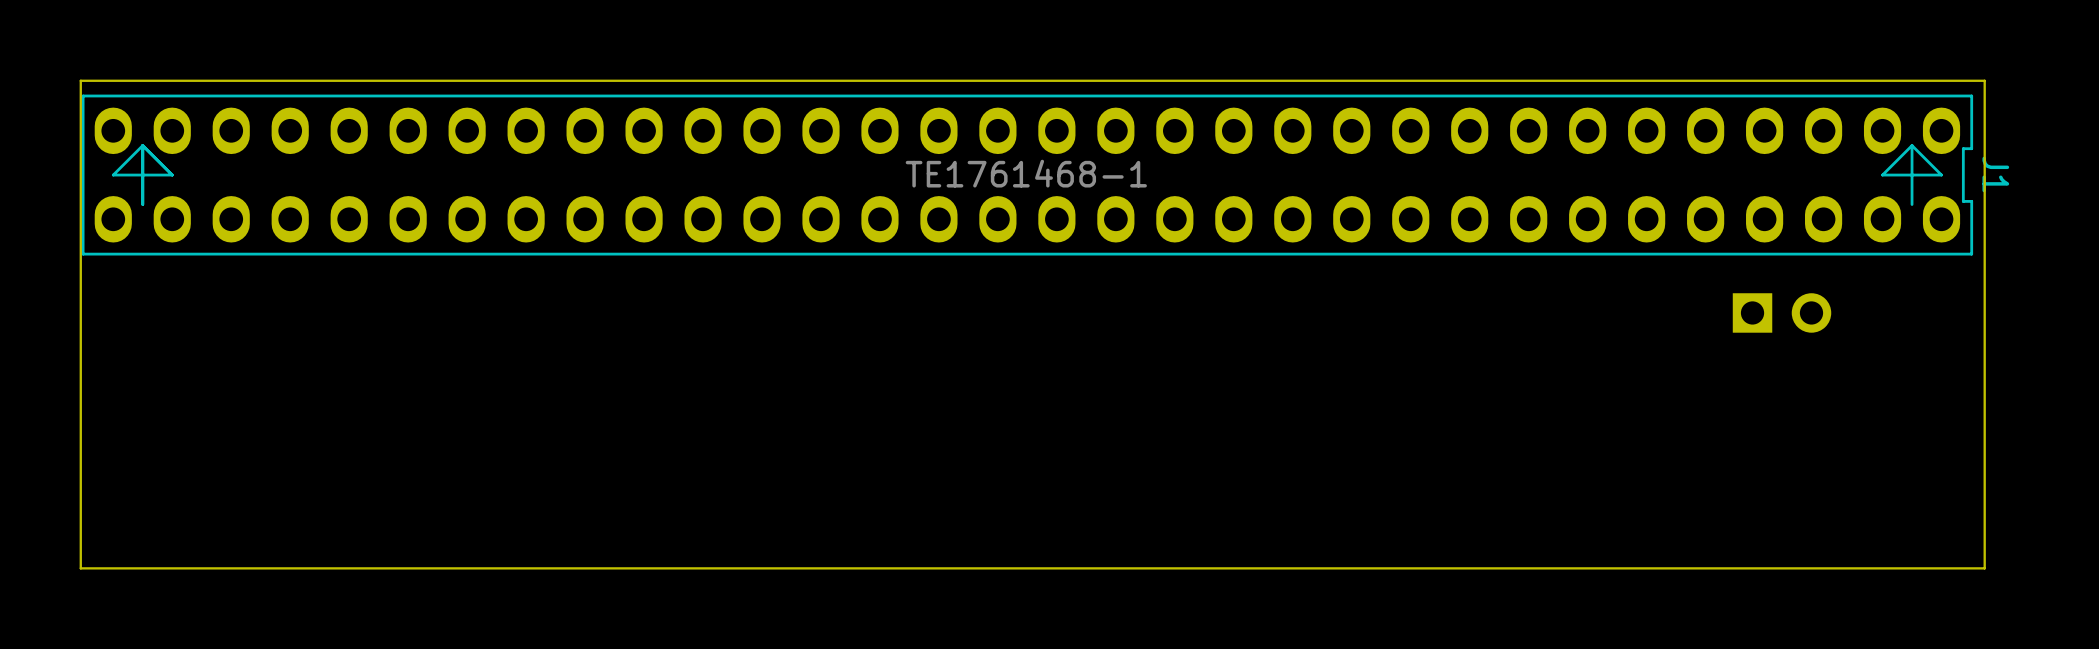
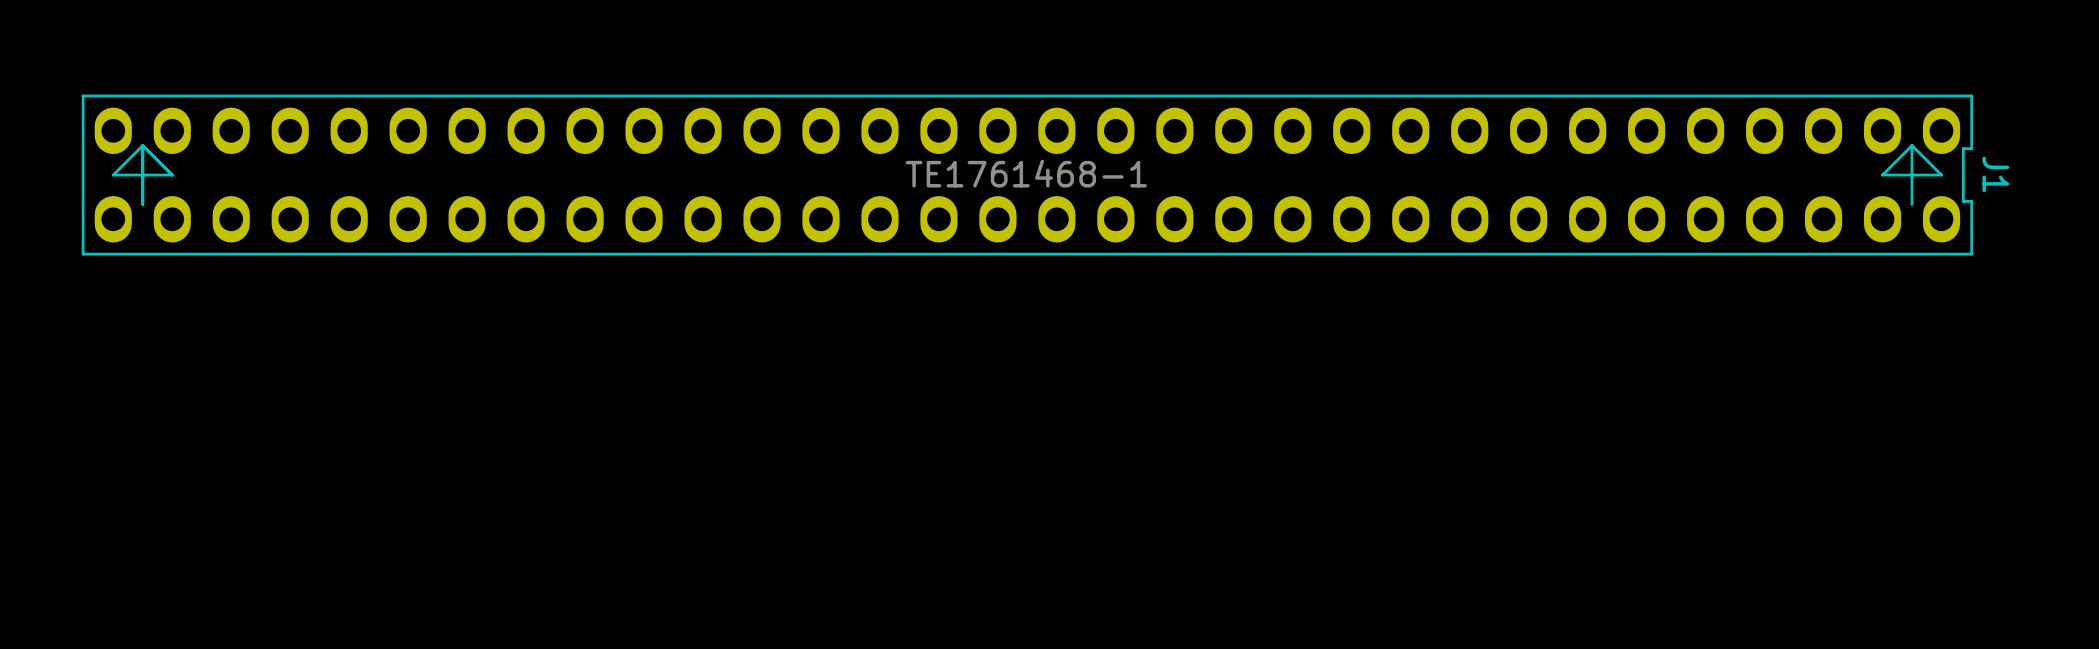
board edge: (1984, 80) (80, 80) (80, 568) (1984, 568) (1984, 80) -> none
part: (1782, 312) -> none

